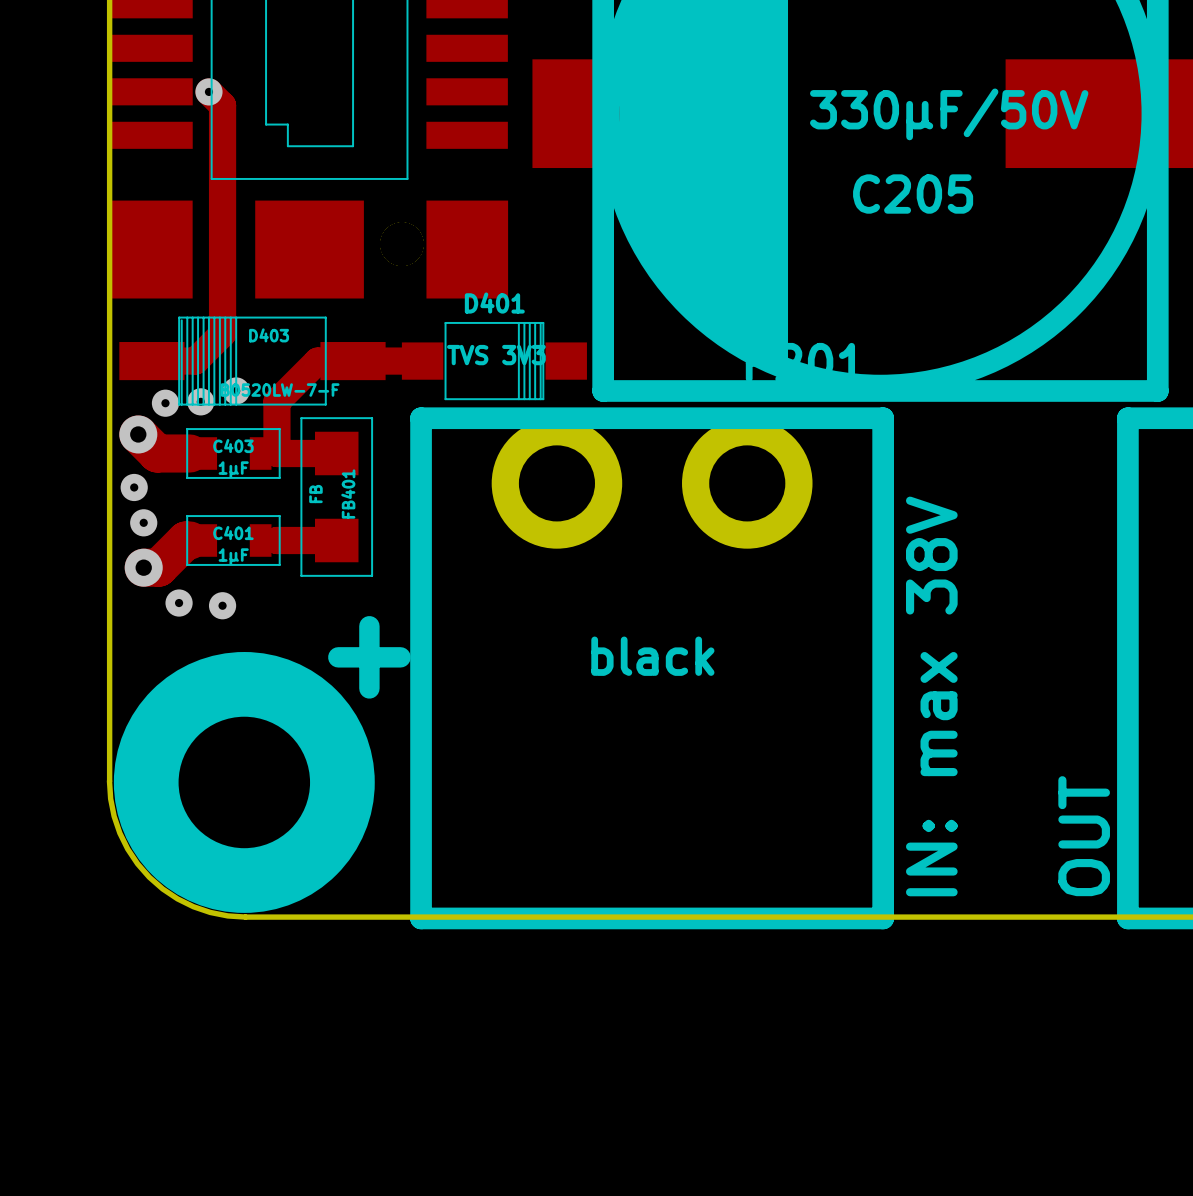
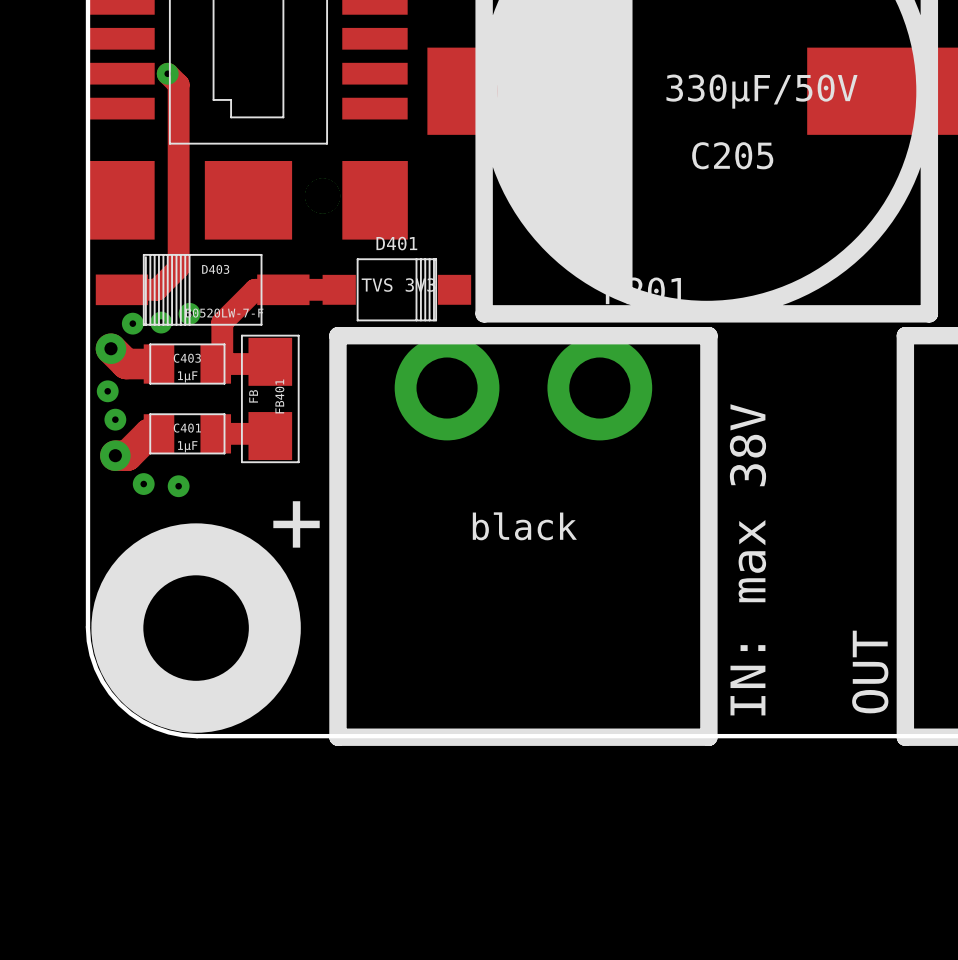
FB401 footprint: [301, 418, 373, 576] -> [241, 335, 299, 463]
C403 footprint: [187, 429, 280, 478] -> [143, 344, 232, 384]
C401 footprint: [187, 516, 280, 565] -> [143, 414, 232, 454]

